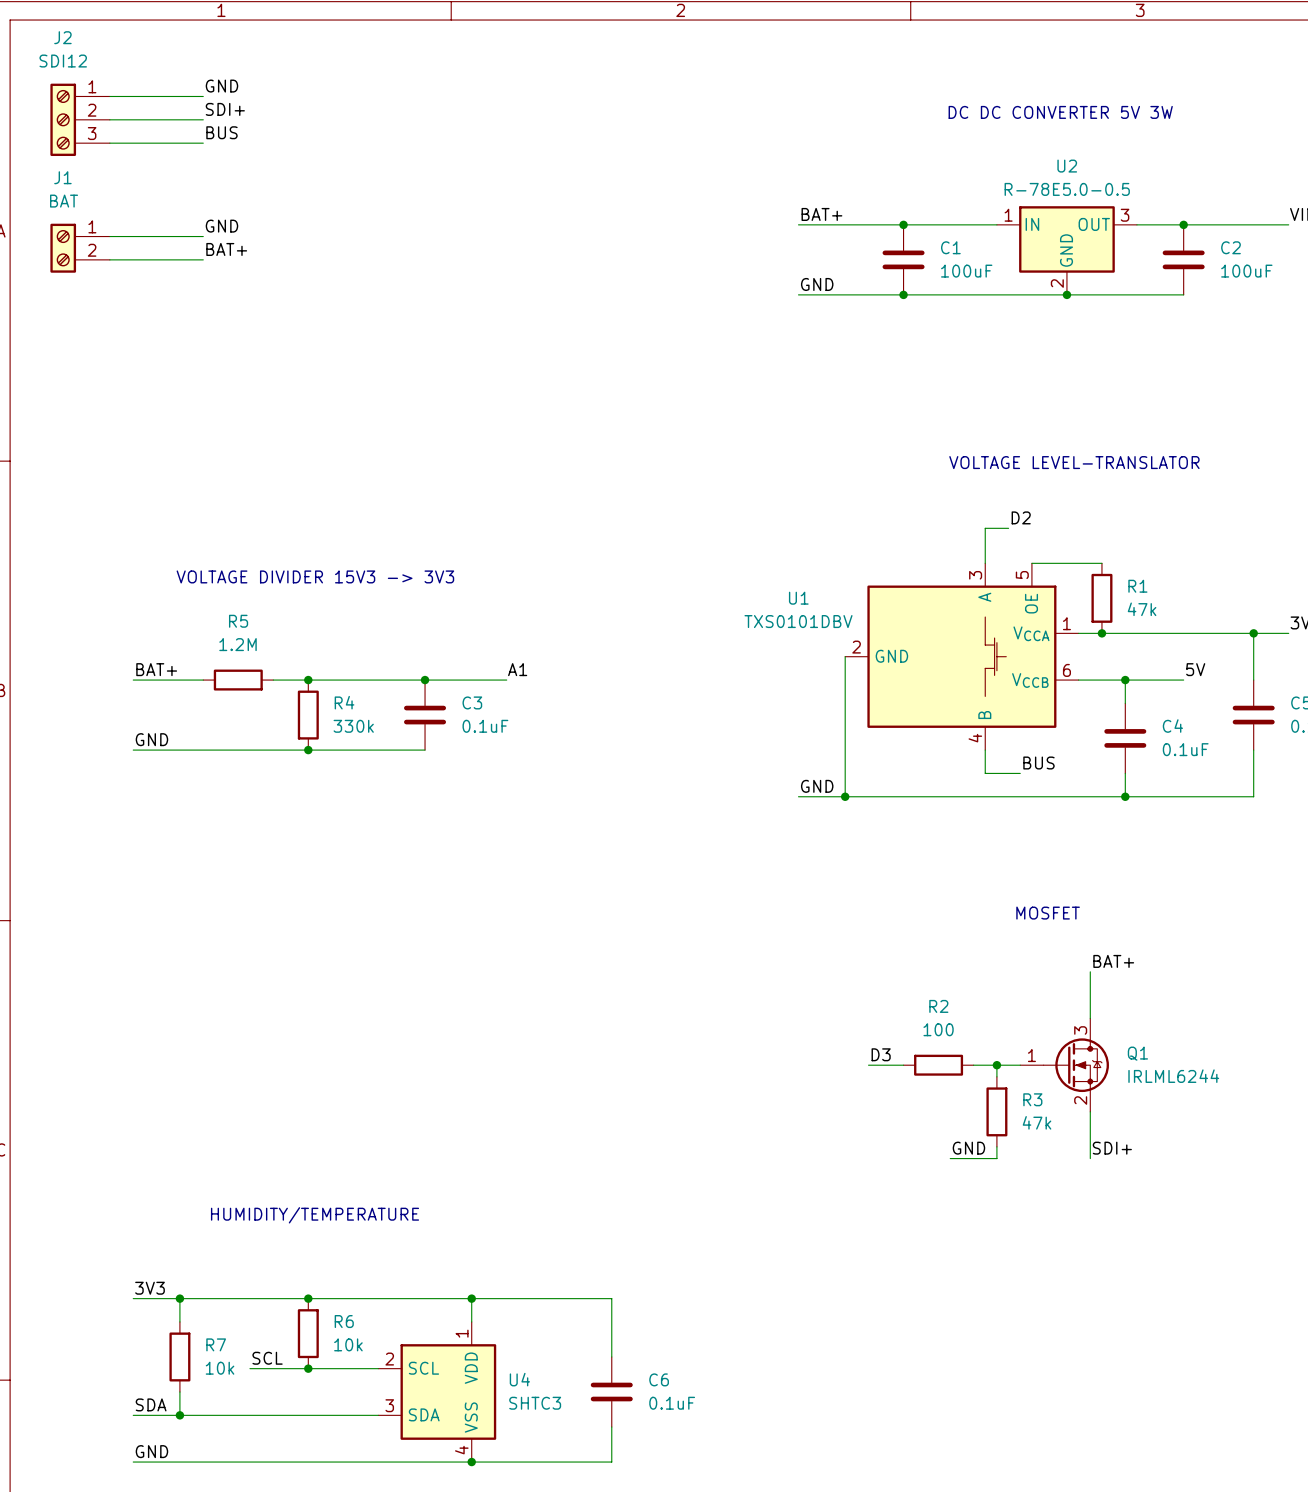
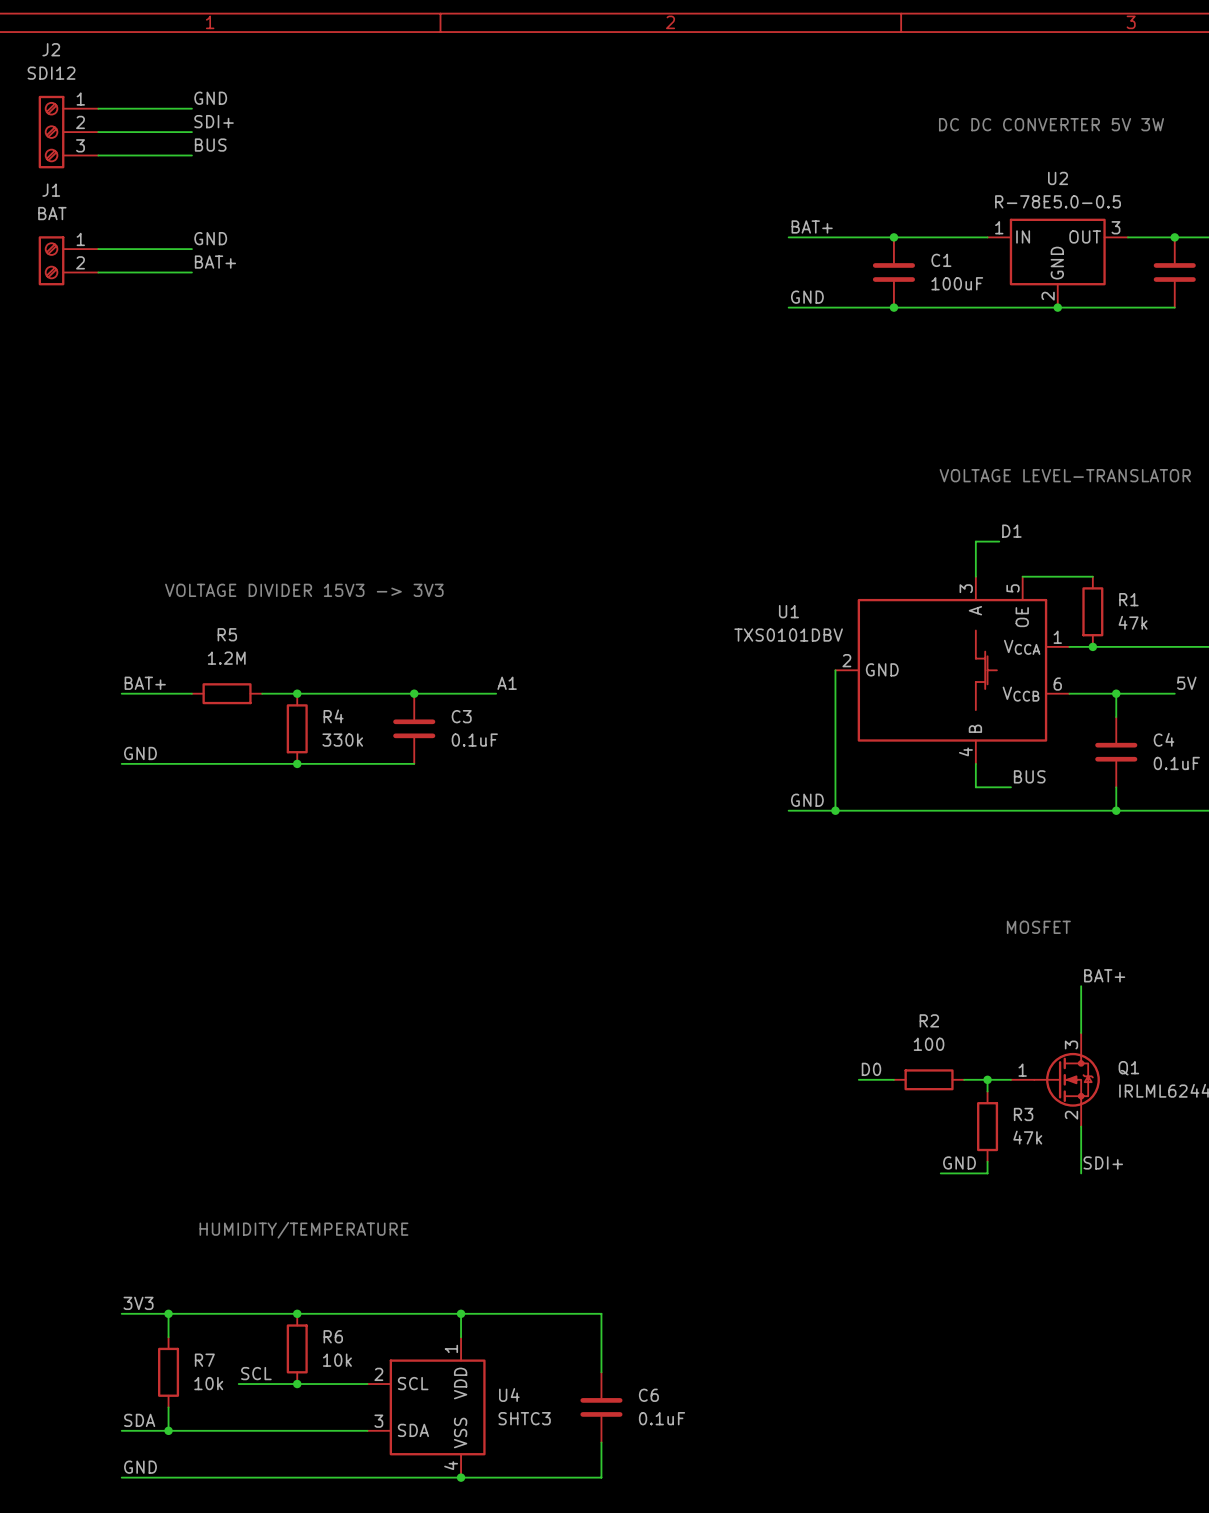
label: D2 (1021, 517) -> D1 (1011, 531)
label: D3 (881, 1054) -> D0 (871, 1069)

